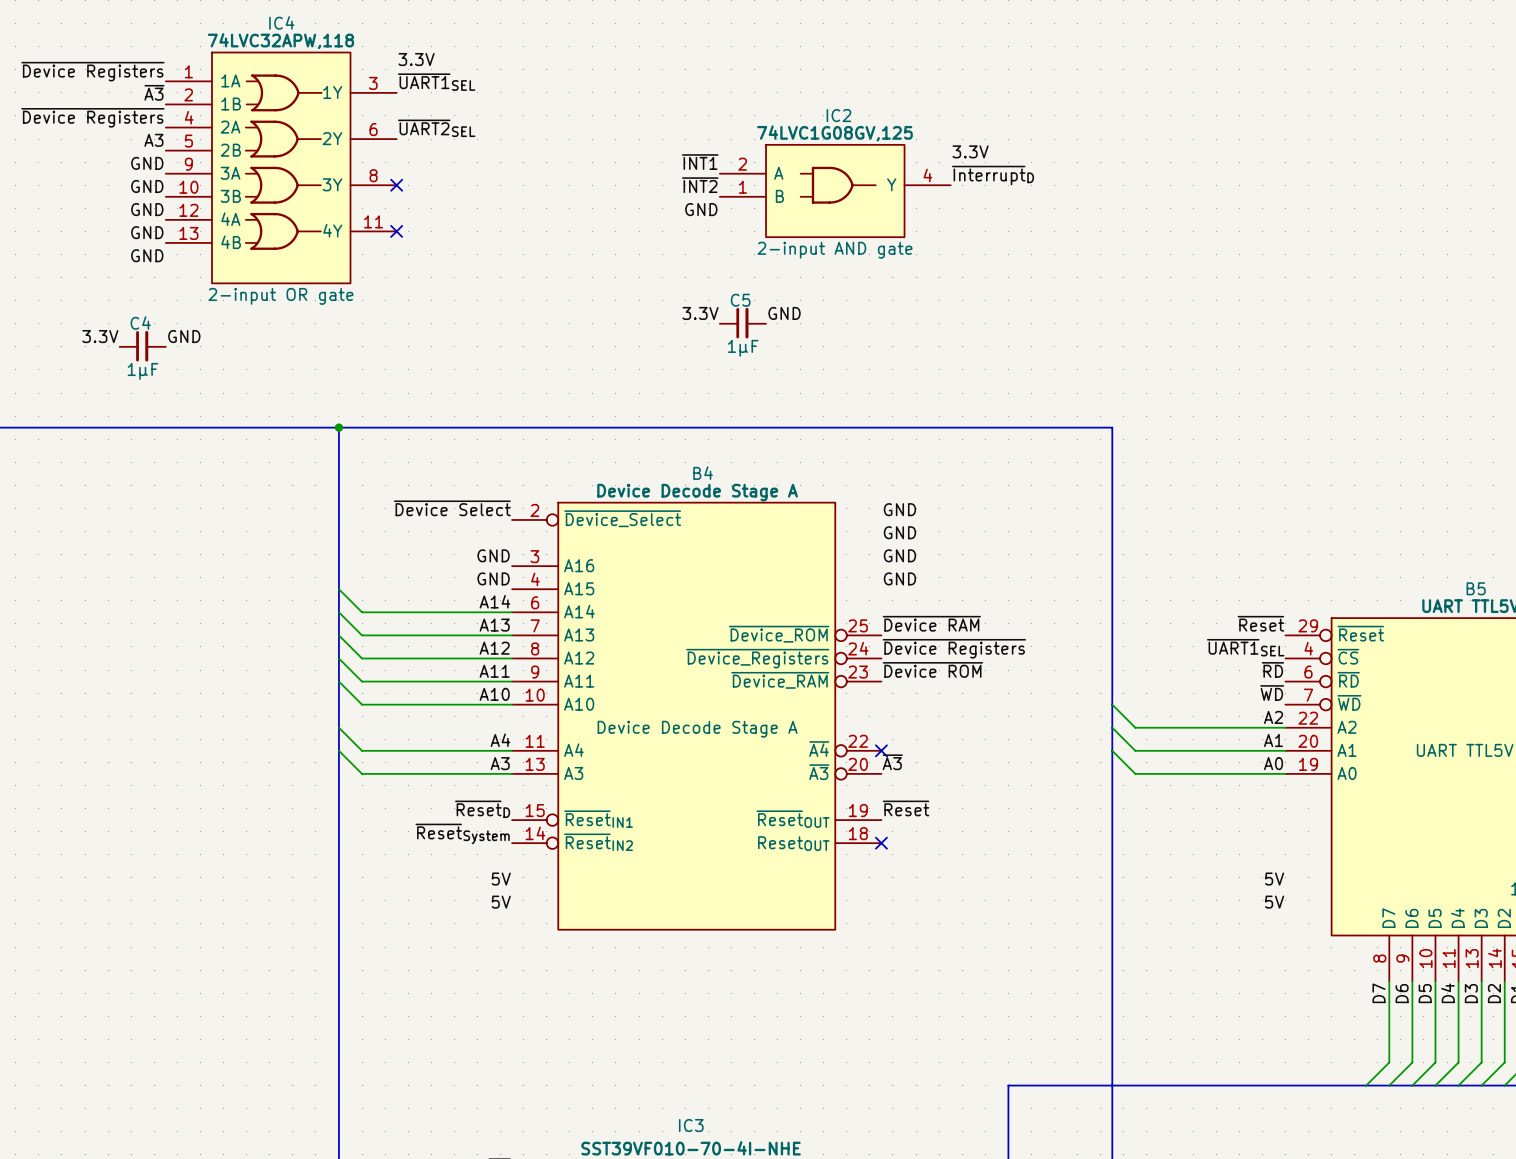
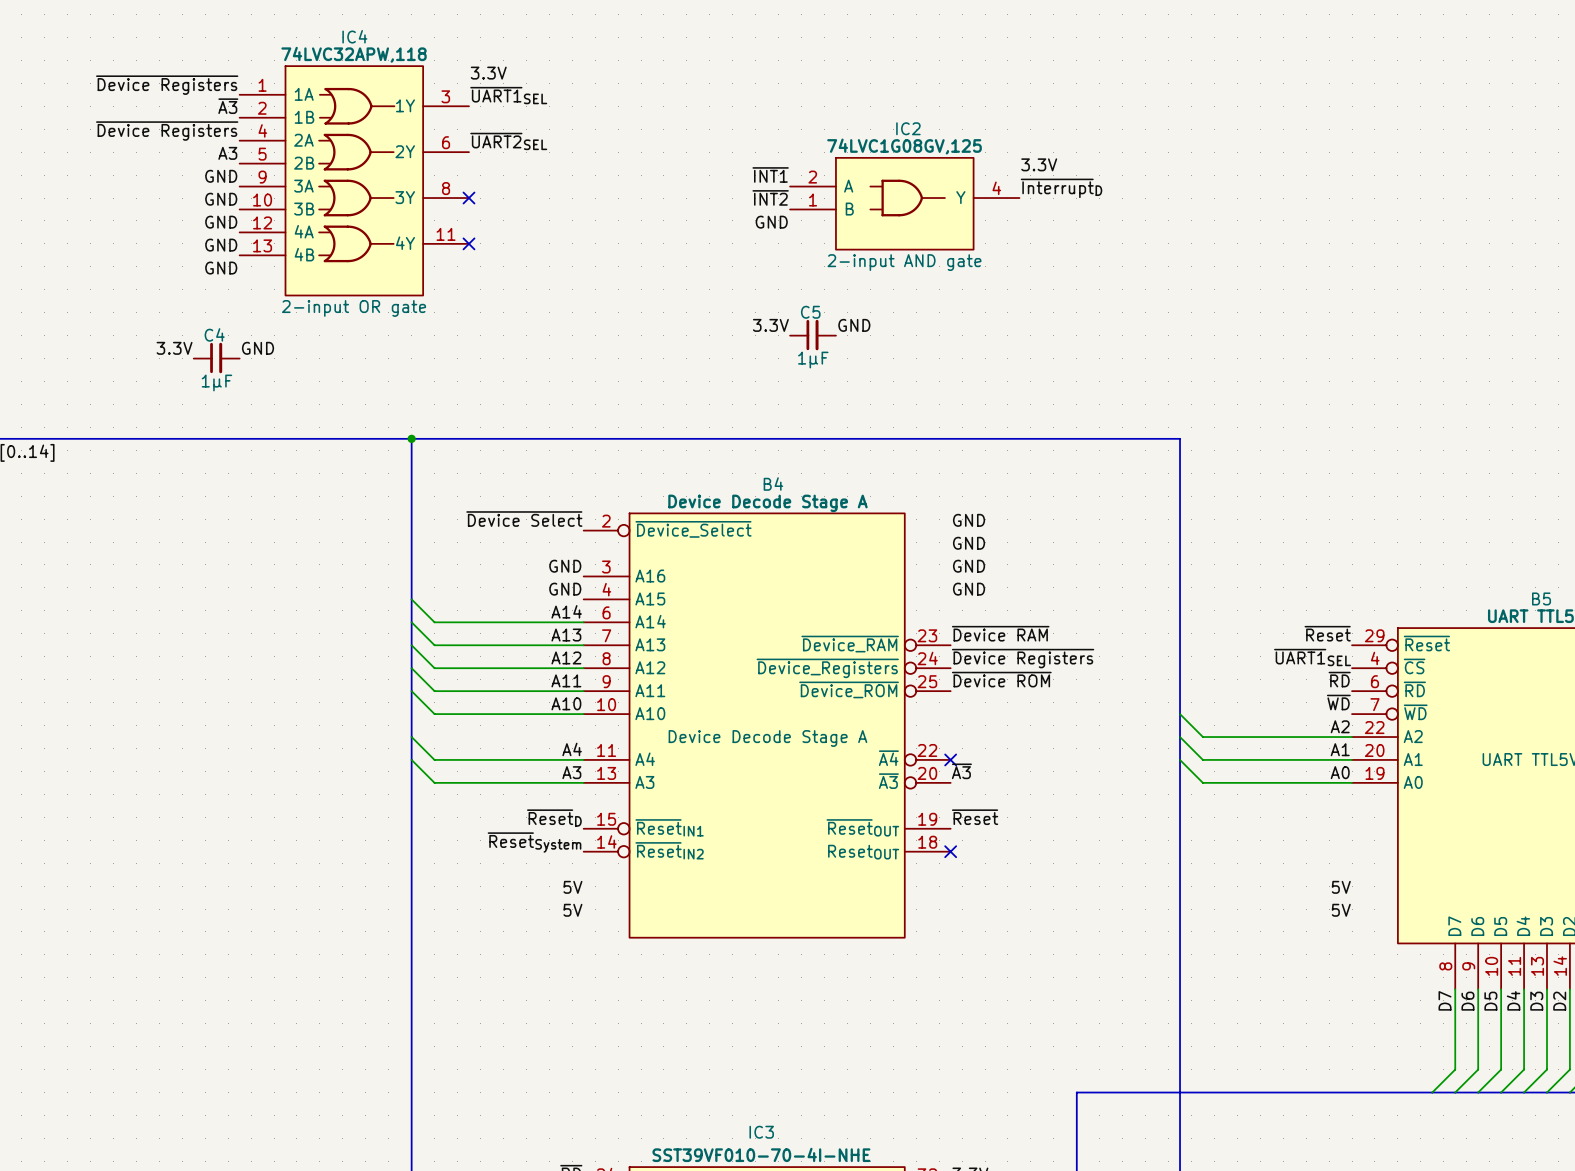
B4 pin number: 25 (858, 625) -> 23 (927, 635)
B4 pin name: ~{Device_ROM} (779, 634) -> ~{Device_RAM} (850, 644)
B4 pin number: 23 (858, 672) -> 25 (927, 681)
B4 pin name: ~{Device_RAM} (780, 680) -> ~{Device_ROM} (849, 689)

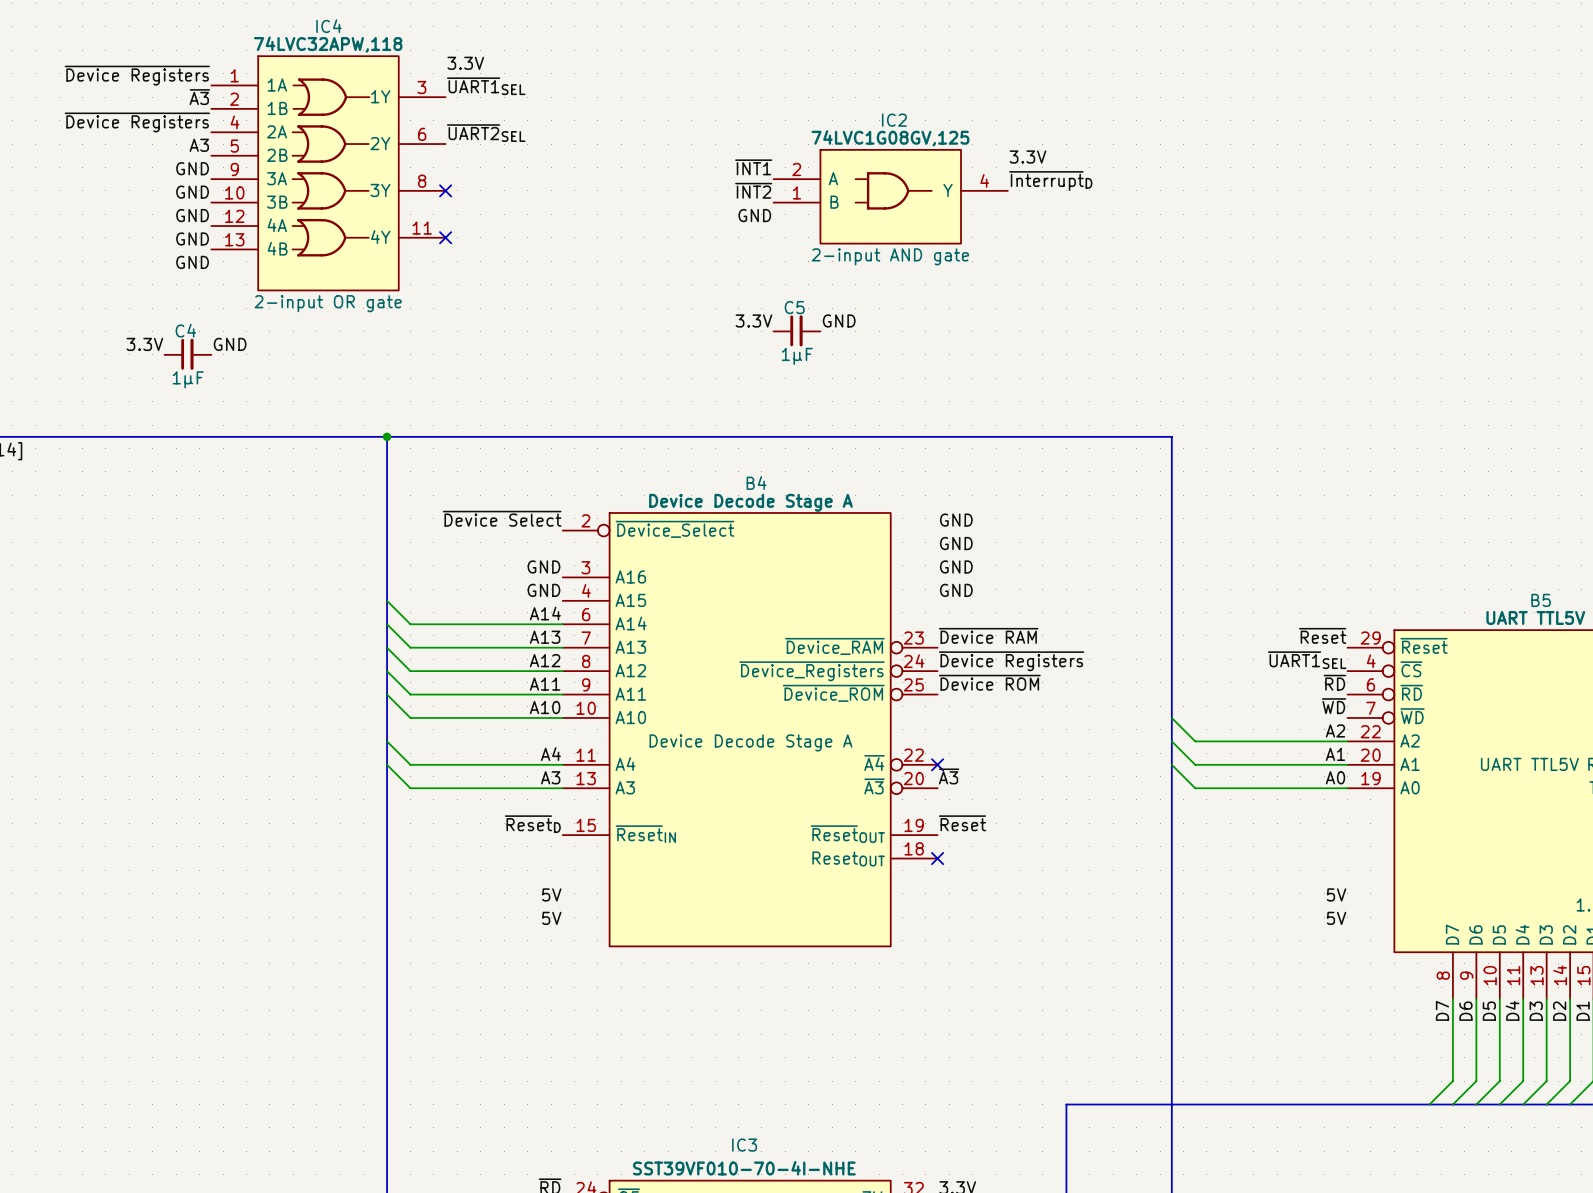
B4 symbol: [583, 512, 951, 939] -> [562, 512, 938, 948]
label: ~{Reset}System (534, 842) -> none

